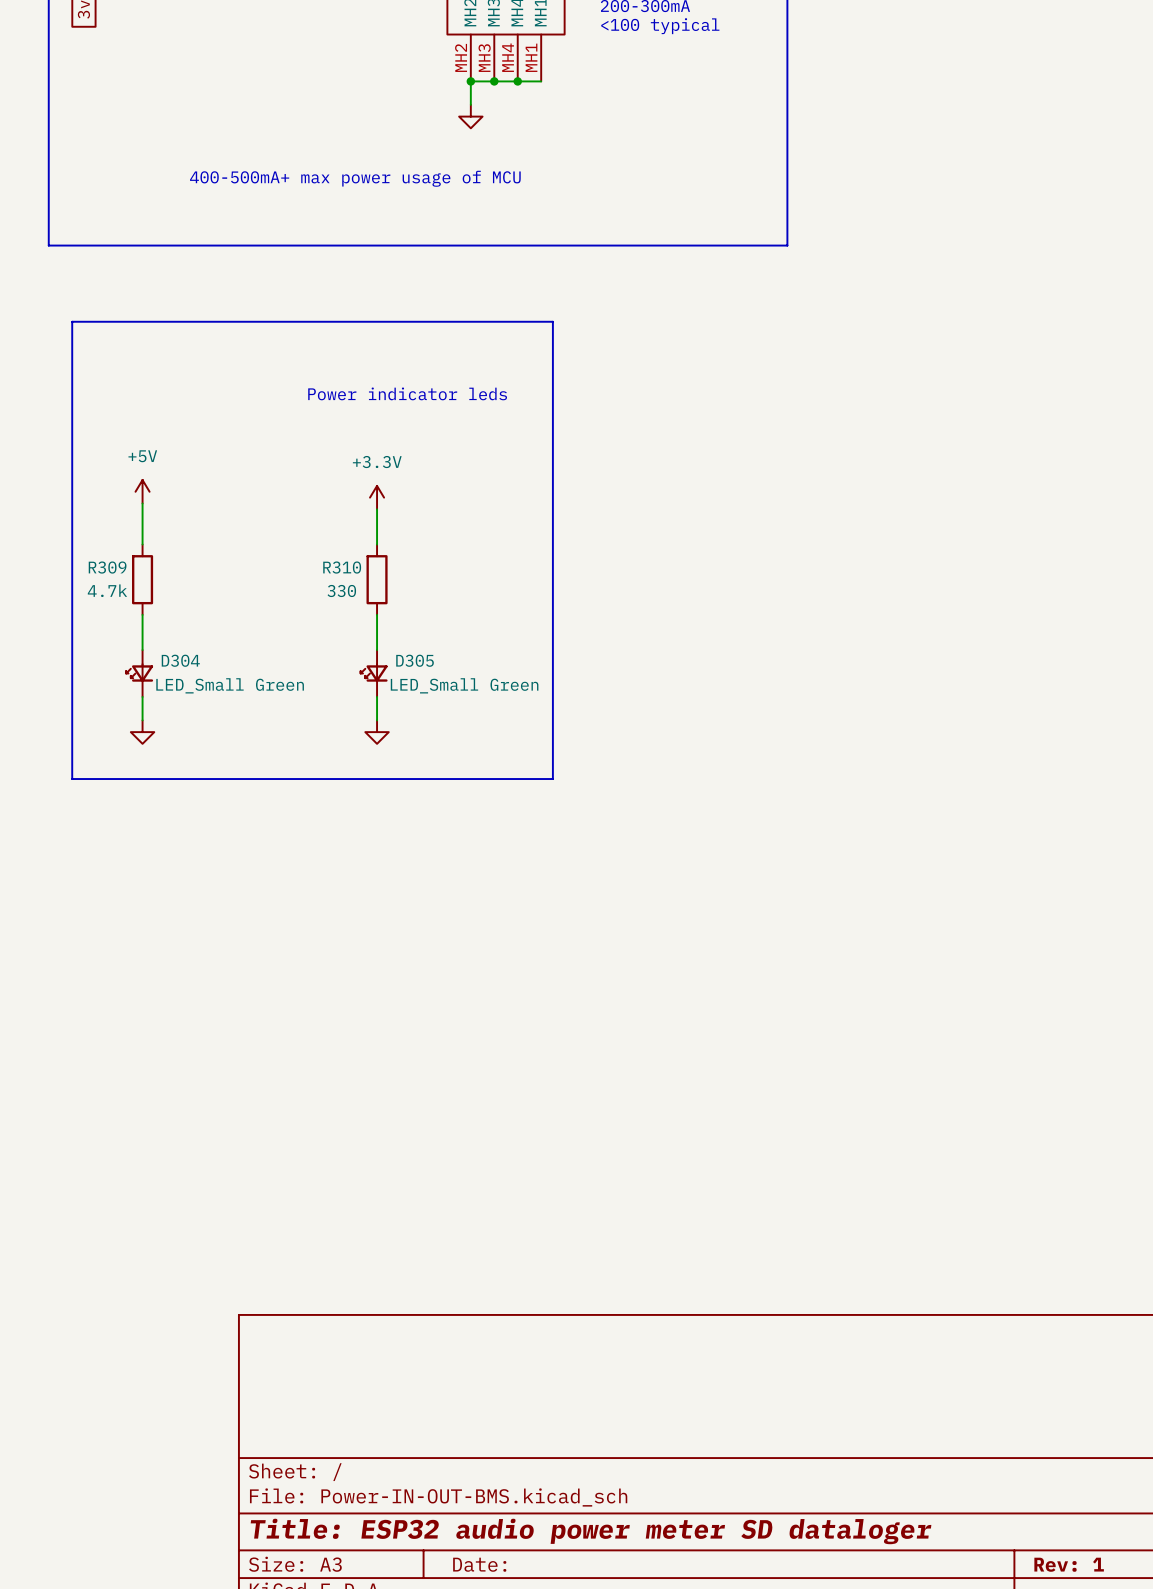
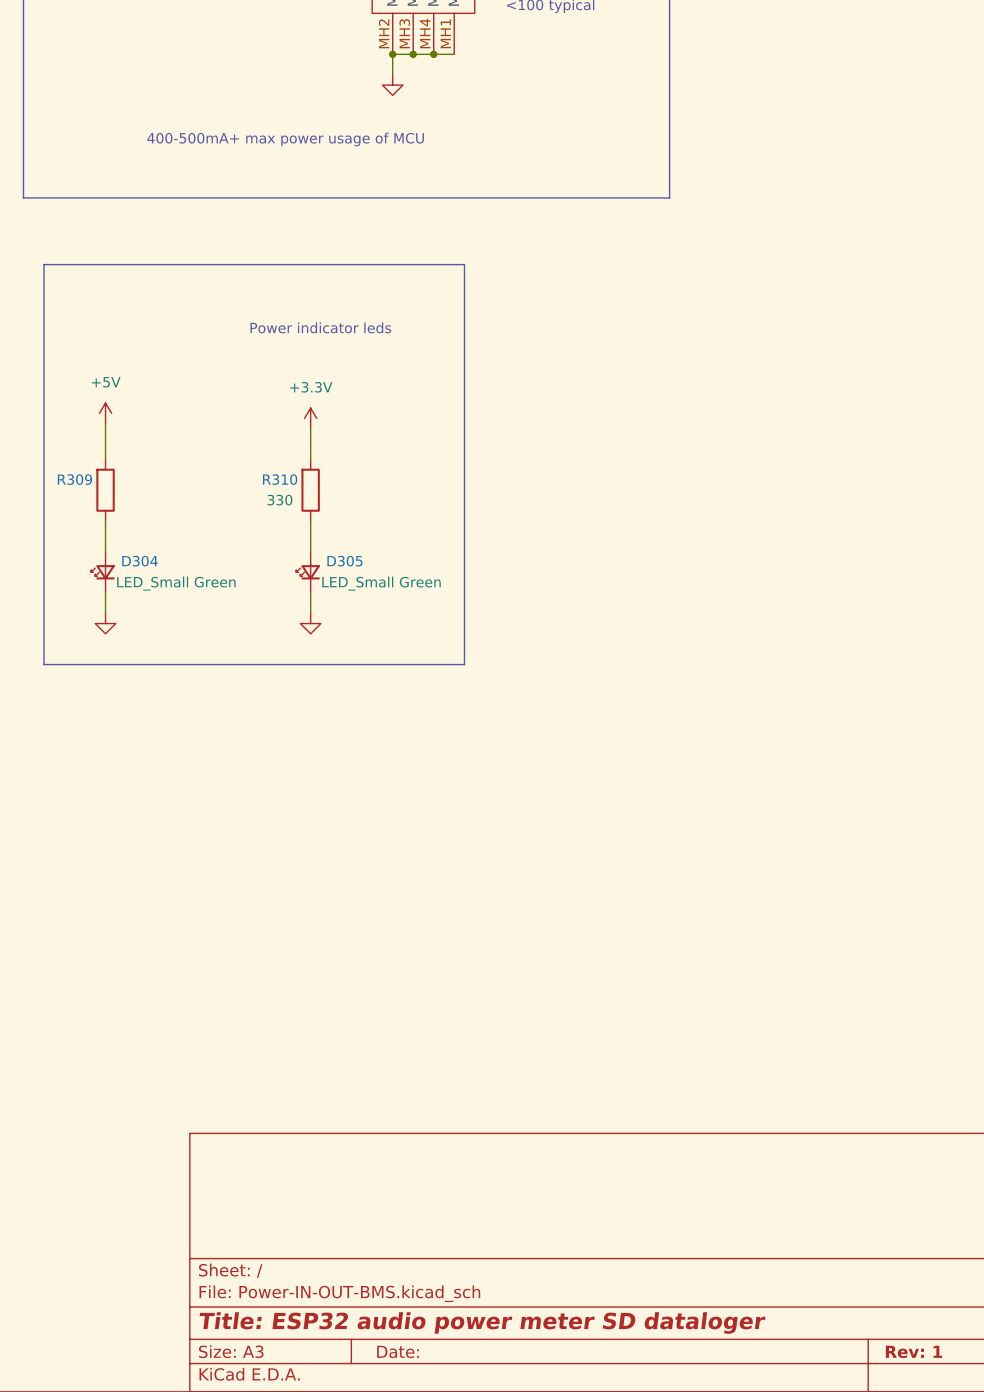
R309 value: 4.7k (107, 590) -> none

